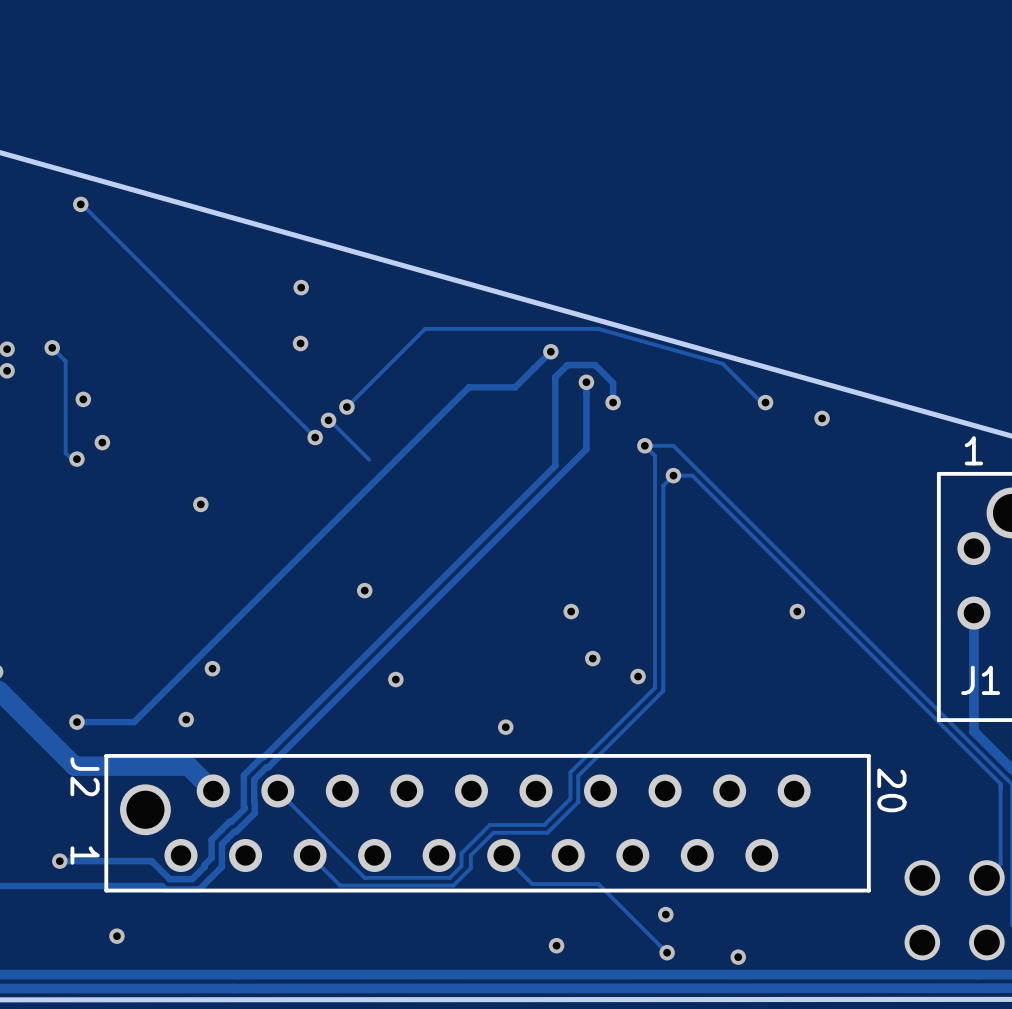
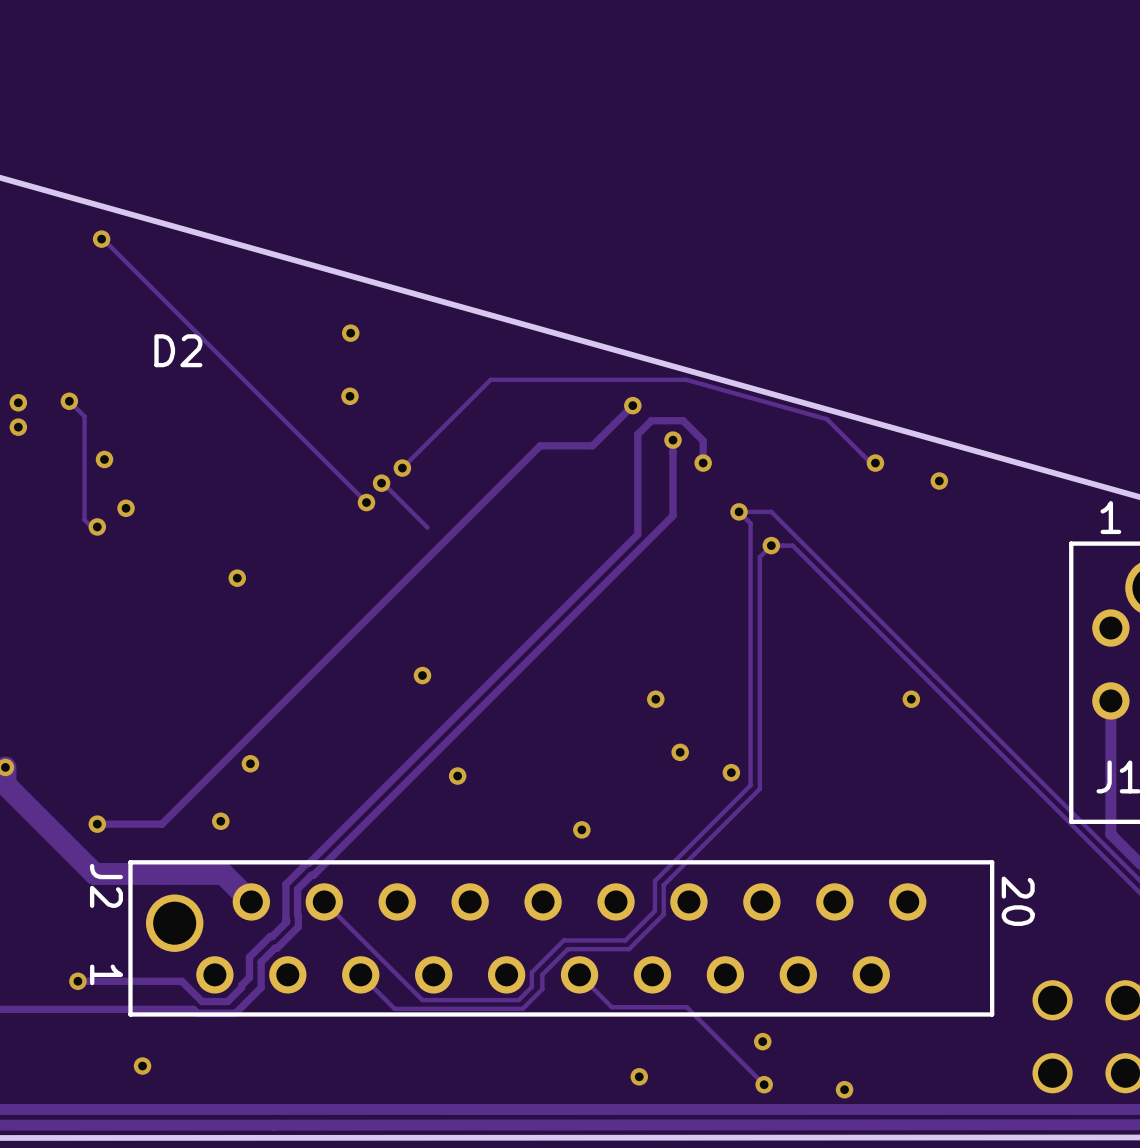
D2: none -> (178, 350)

